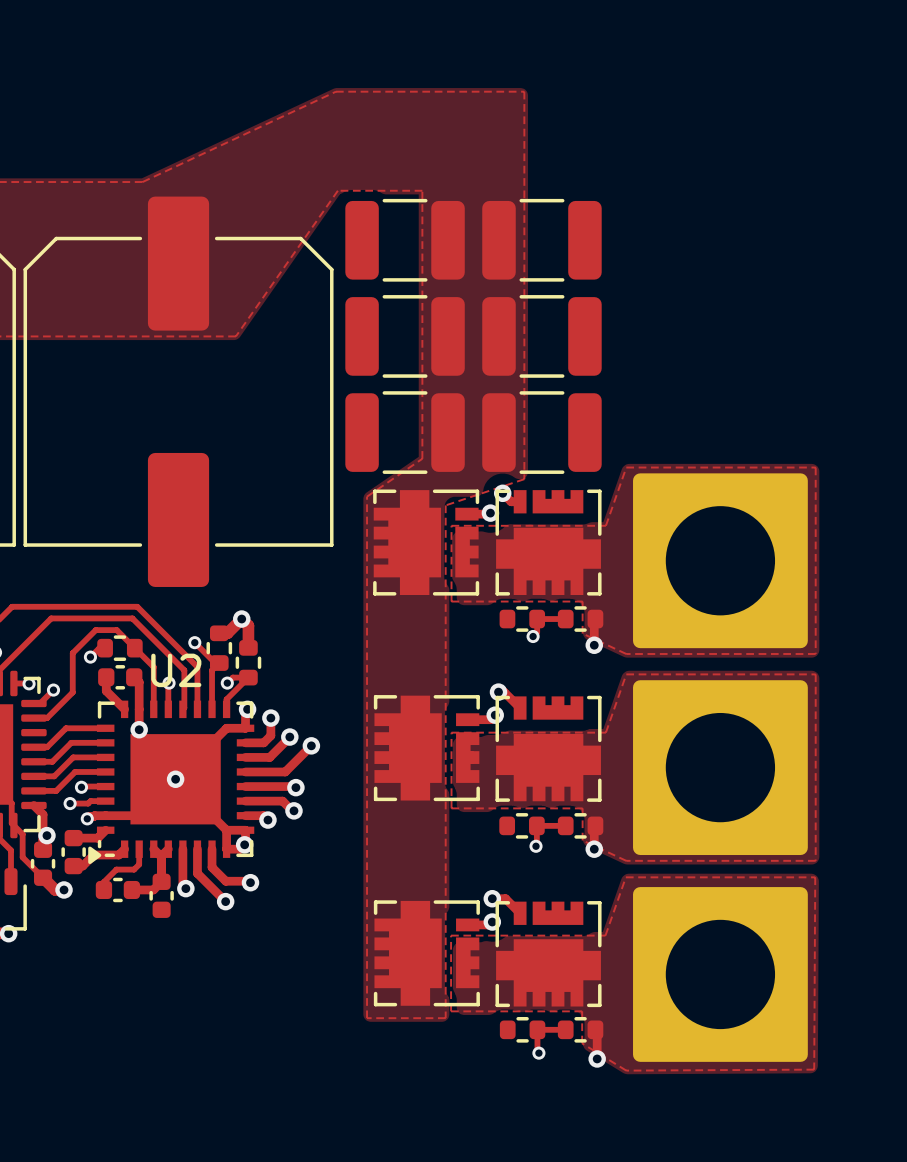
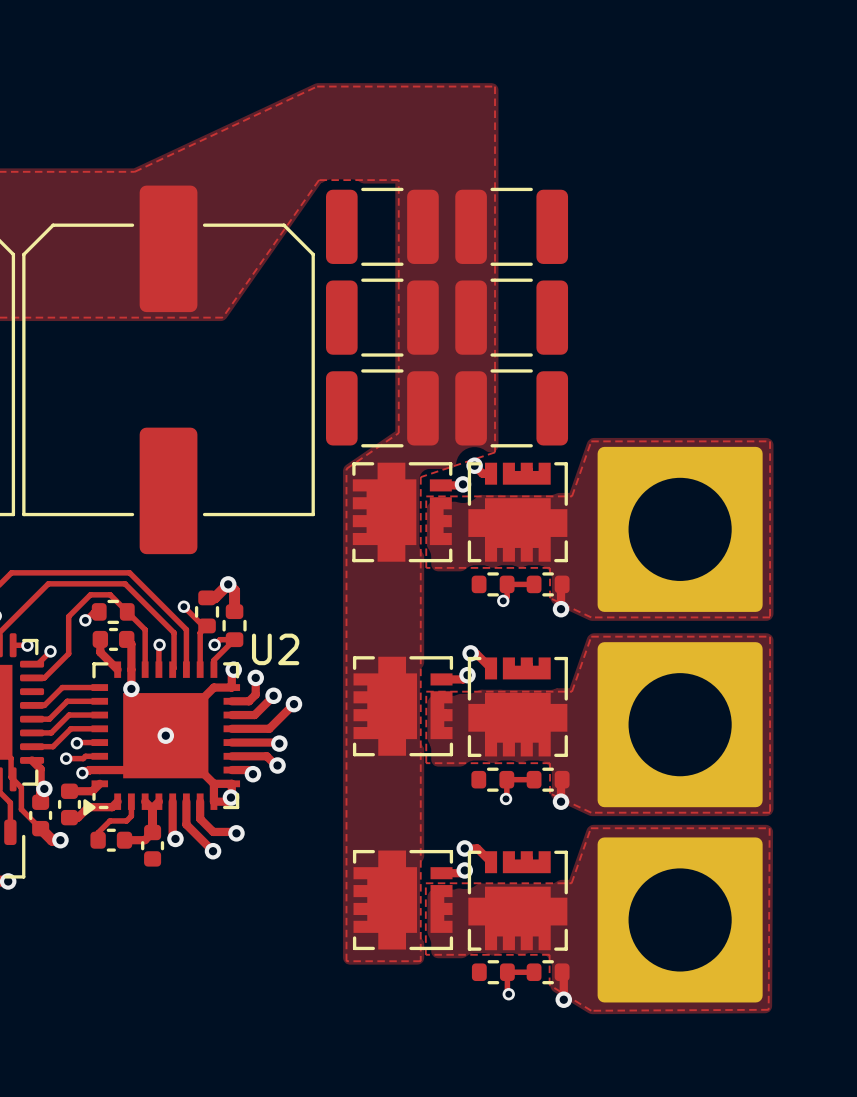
U2 name position: U2 (176, 670) -> U2 (275, 649)

